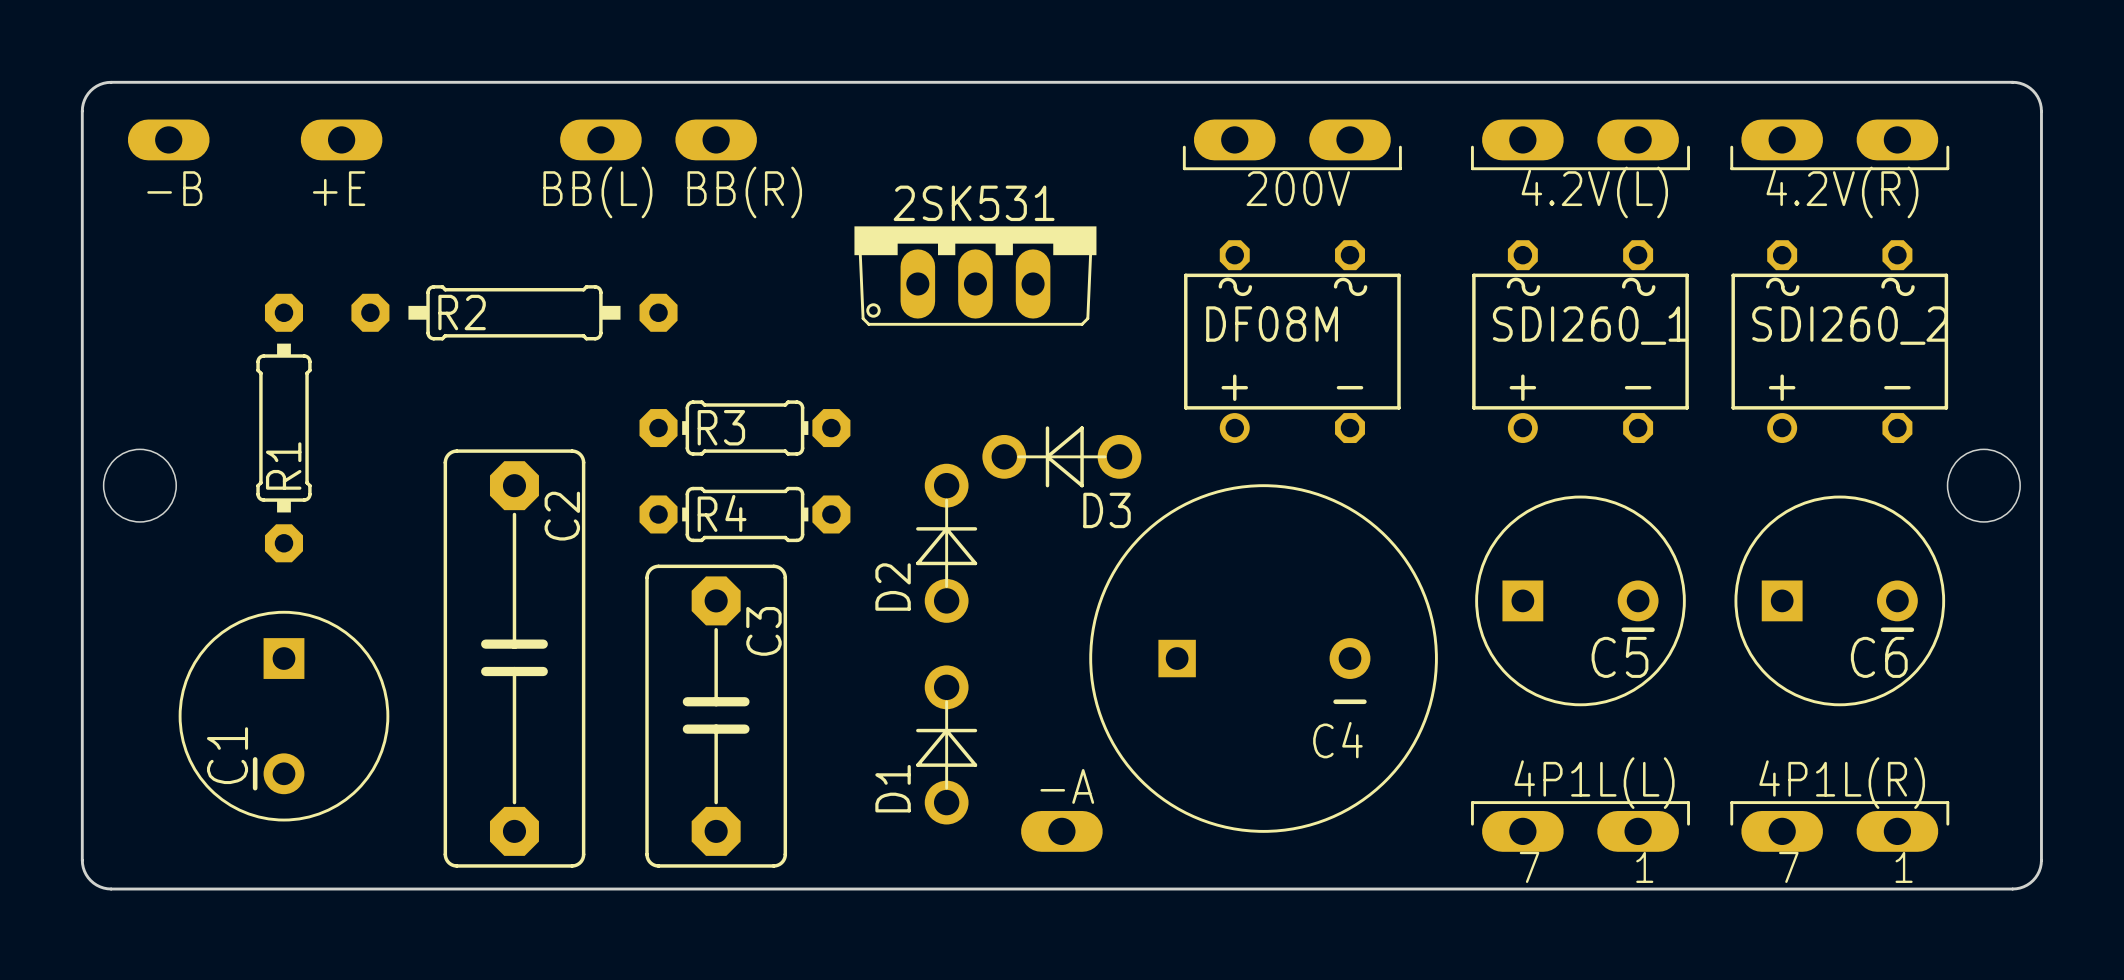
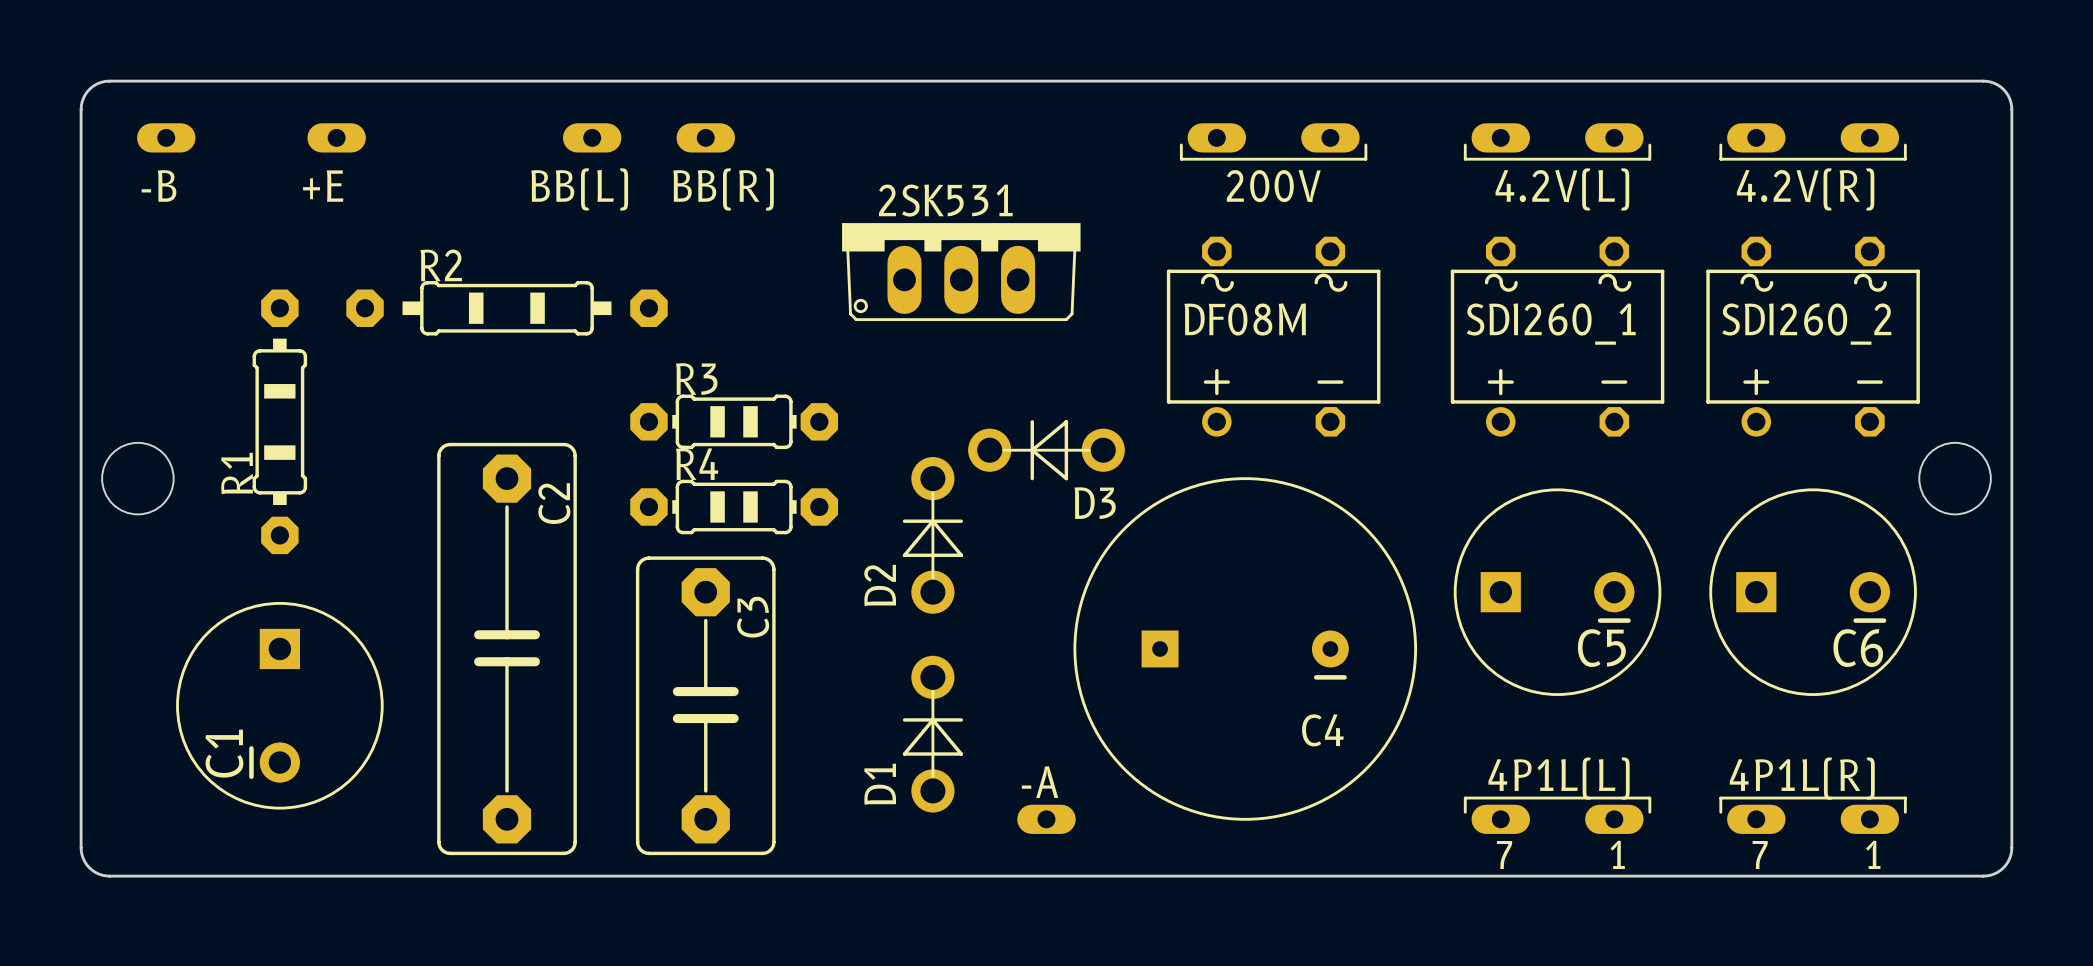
part footprint: [80, 80, 2043, 891] -> [79, 79, 2014, 878]
R2 footprint: [351, 285, 678, 341] -> [346, 281, 668, 336]
R1 footprint: [256, 293, 312, 563] -> [252, 289, 308, 555]
R2 name position: R2 (462, 312) -> R2 (441, 265)
R3 footprint: [639, 400, 851, 456] -> [630, 394, 839, 450]
R1 name position: R1 (283, 466) -> R1 (236, 473)
C4 footprint: [1089, 484, 1438, 833] -> [1073, 477, 1418, 821]
R4 footprint: [639, 486, 851, 543] -> [630, 479, 839, 535]
R4 name position: R4 (722, 513) -> R4 (697, 464)

